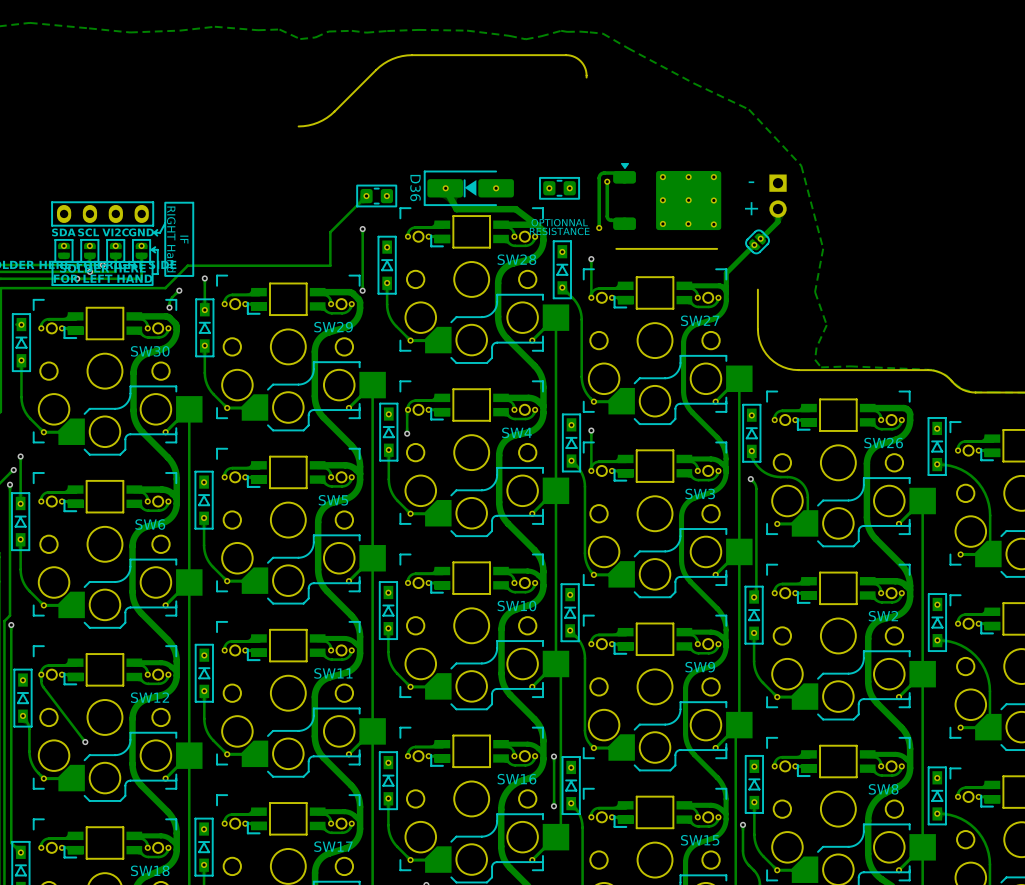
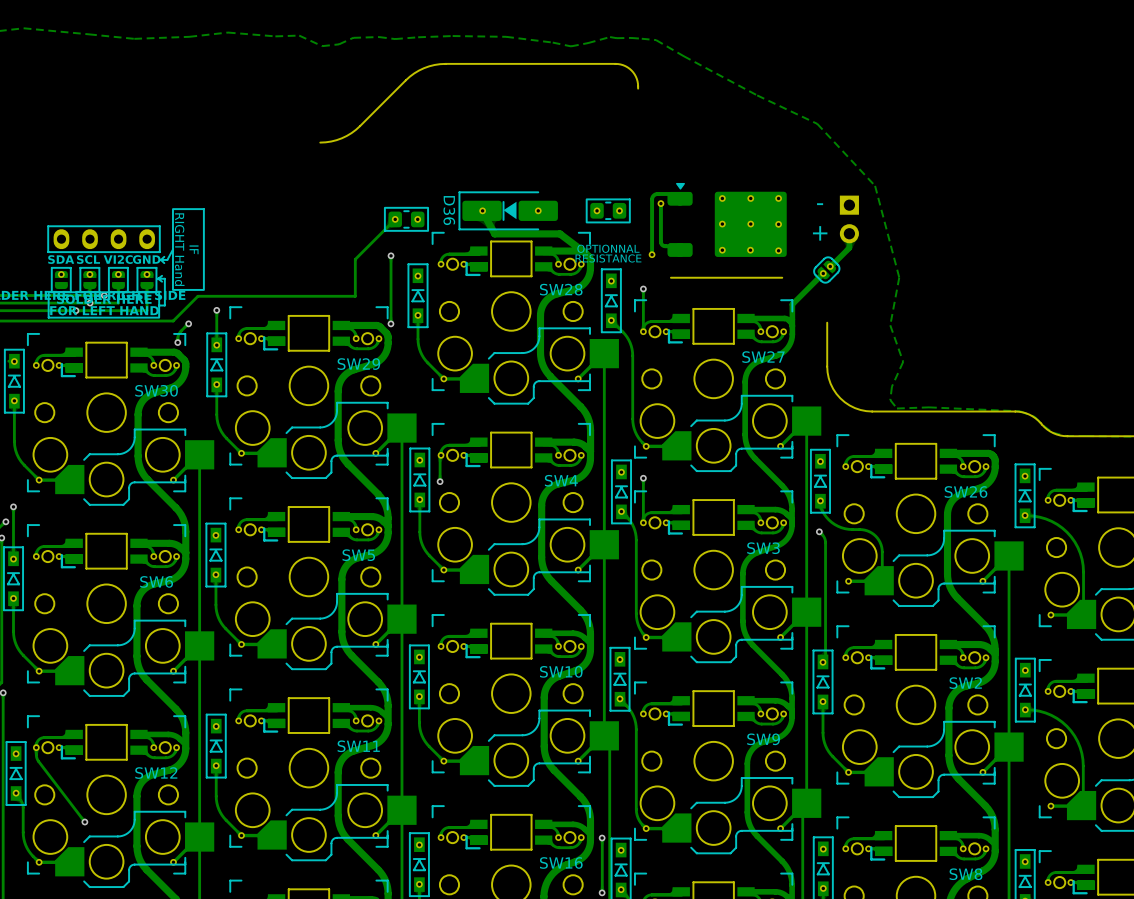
part: none -> (125, 249)
part: (122, 238) -> none

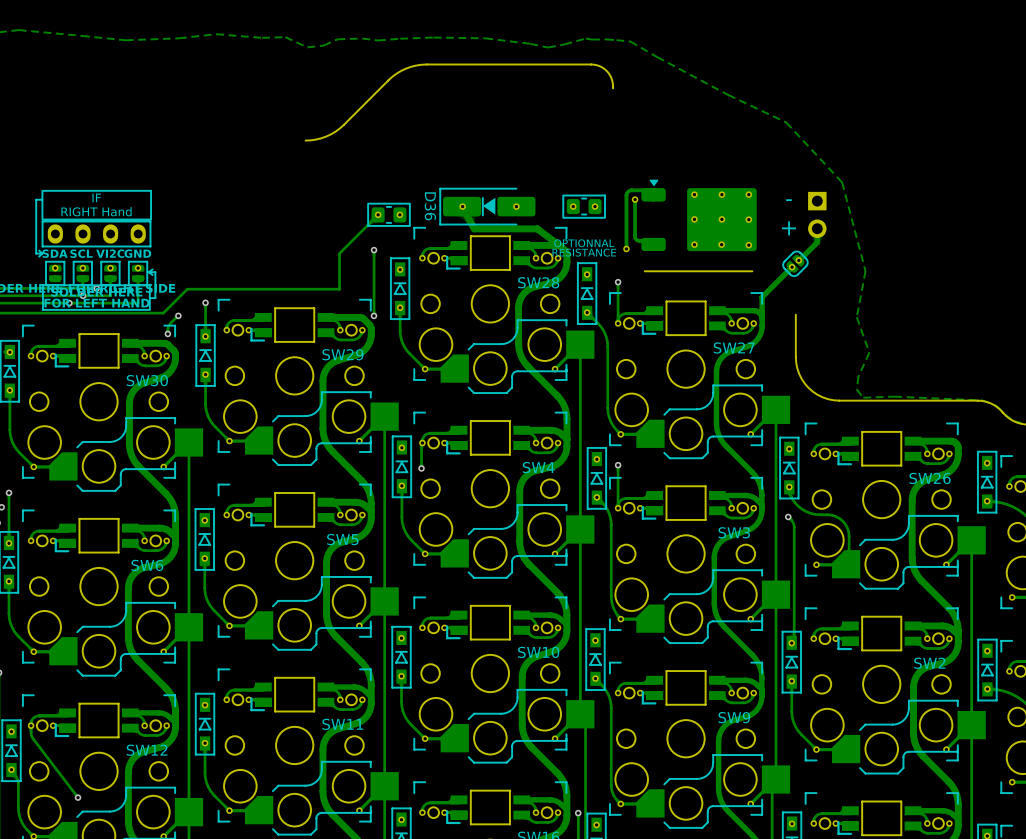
part: none -> (93, 223)
part: (125, 249) -> none

